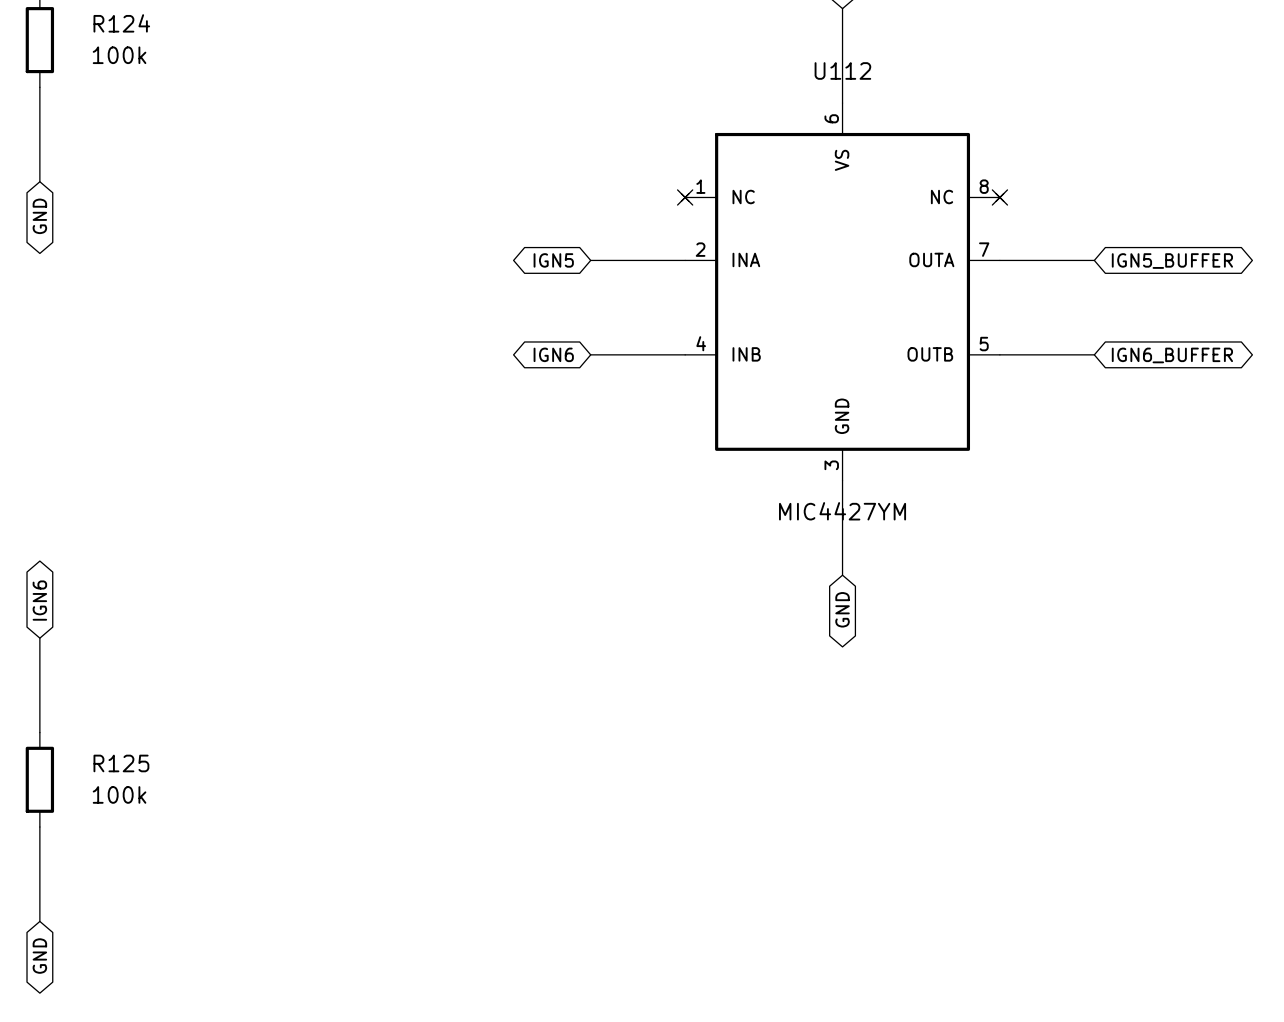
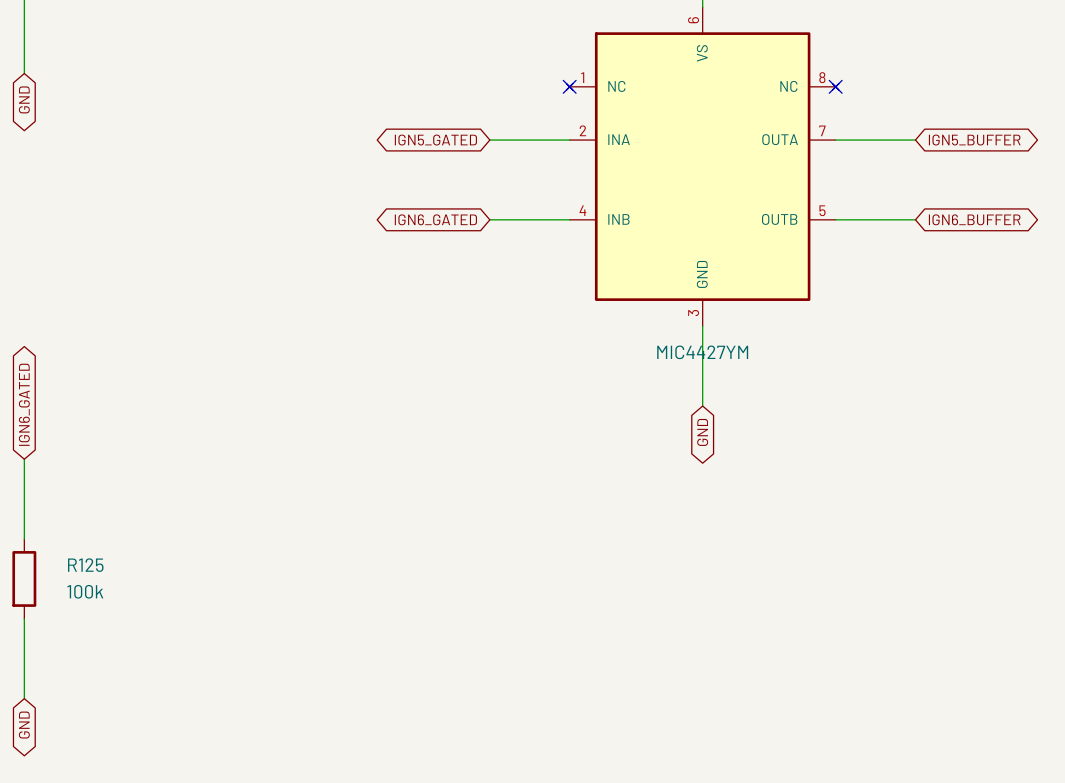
global label: IGN5 (553, 260) -> IGN5_GATED (435, 140)
global label: IGN6 (553, 354) -> IGN6_GATED (435, 219)
global label: IGN6 (39, 600) -> IGN6_GATED (24, 404)

